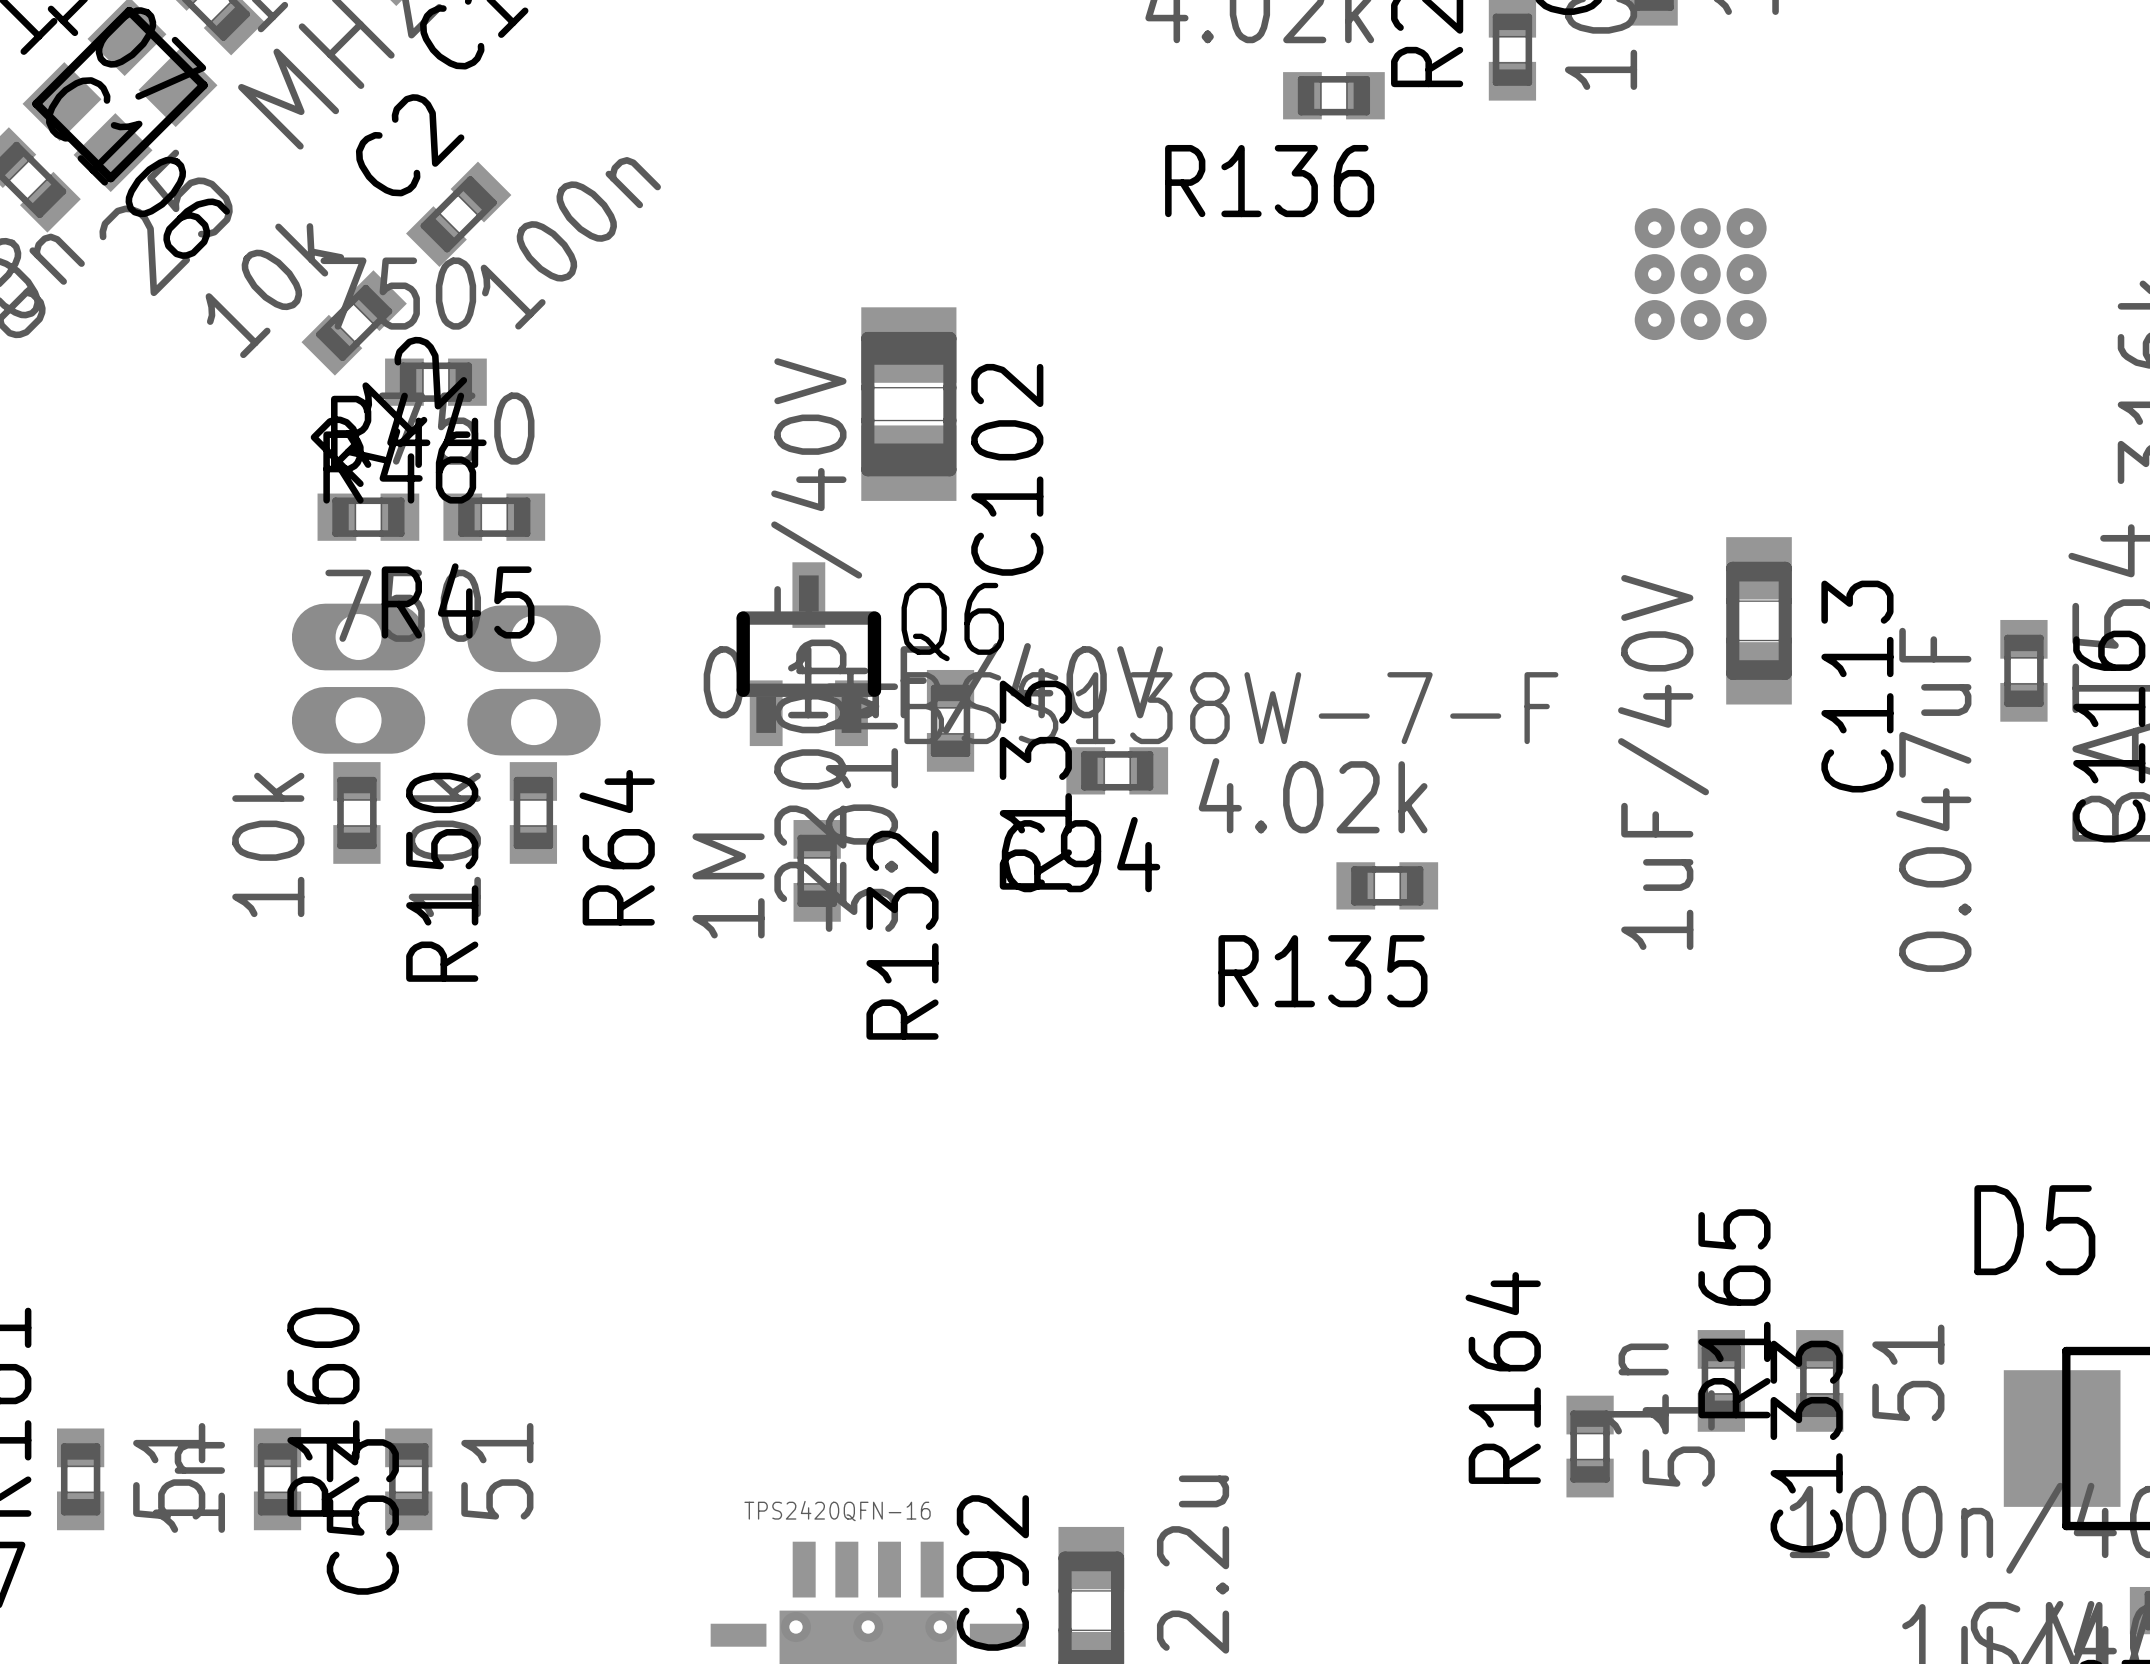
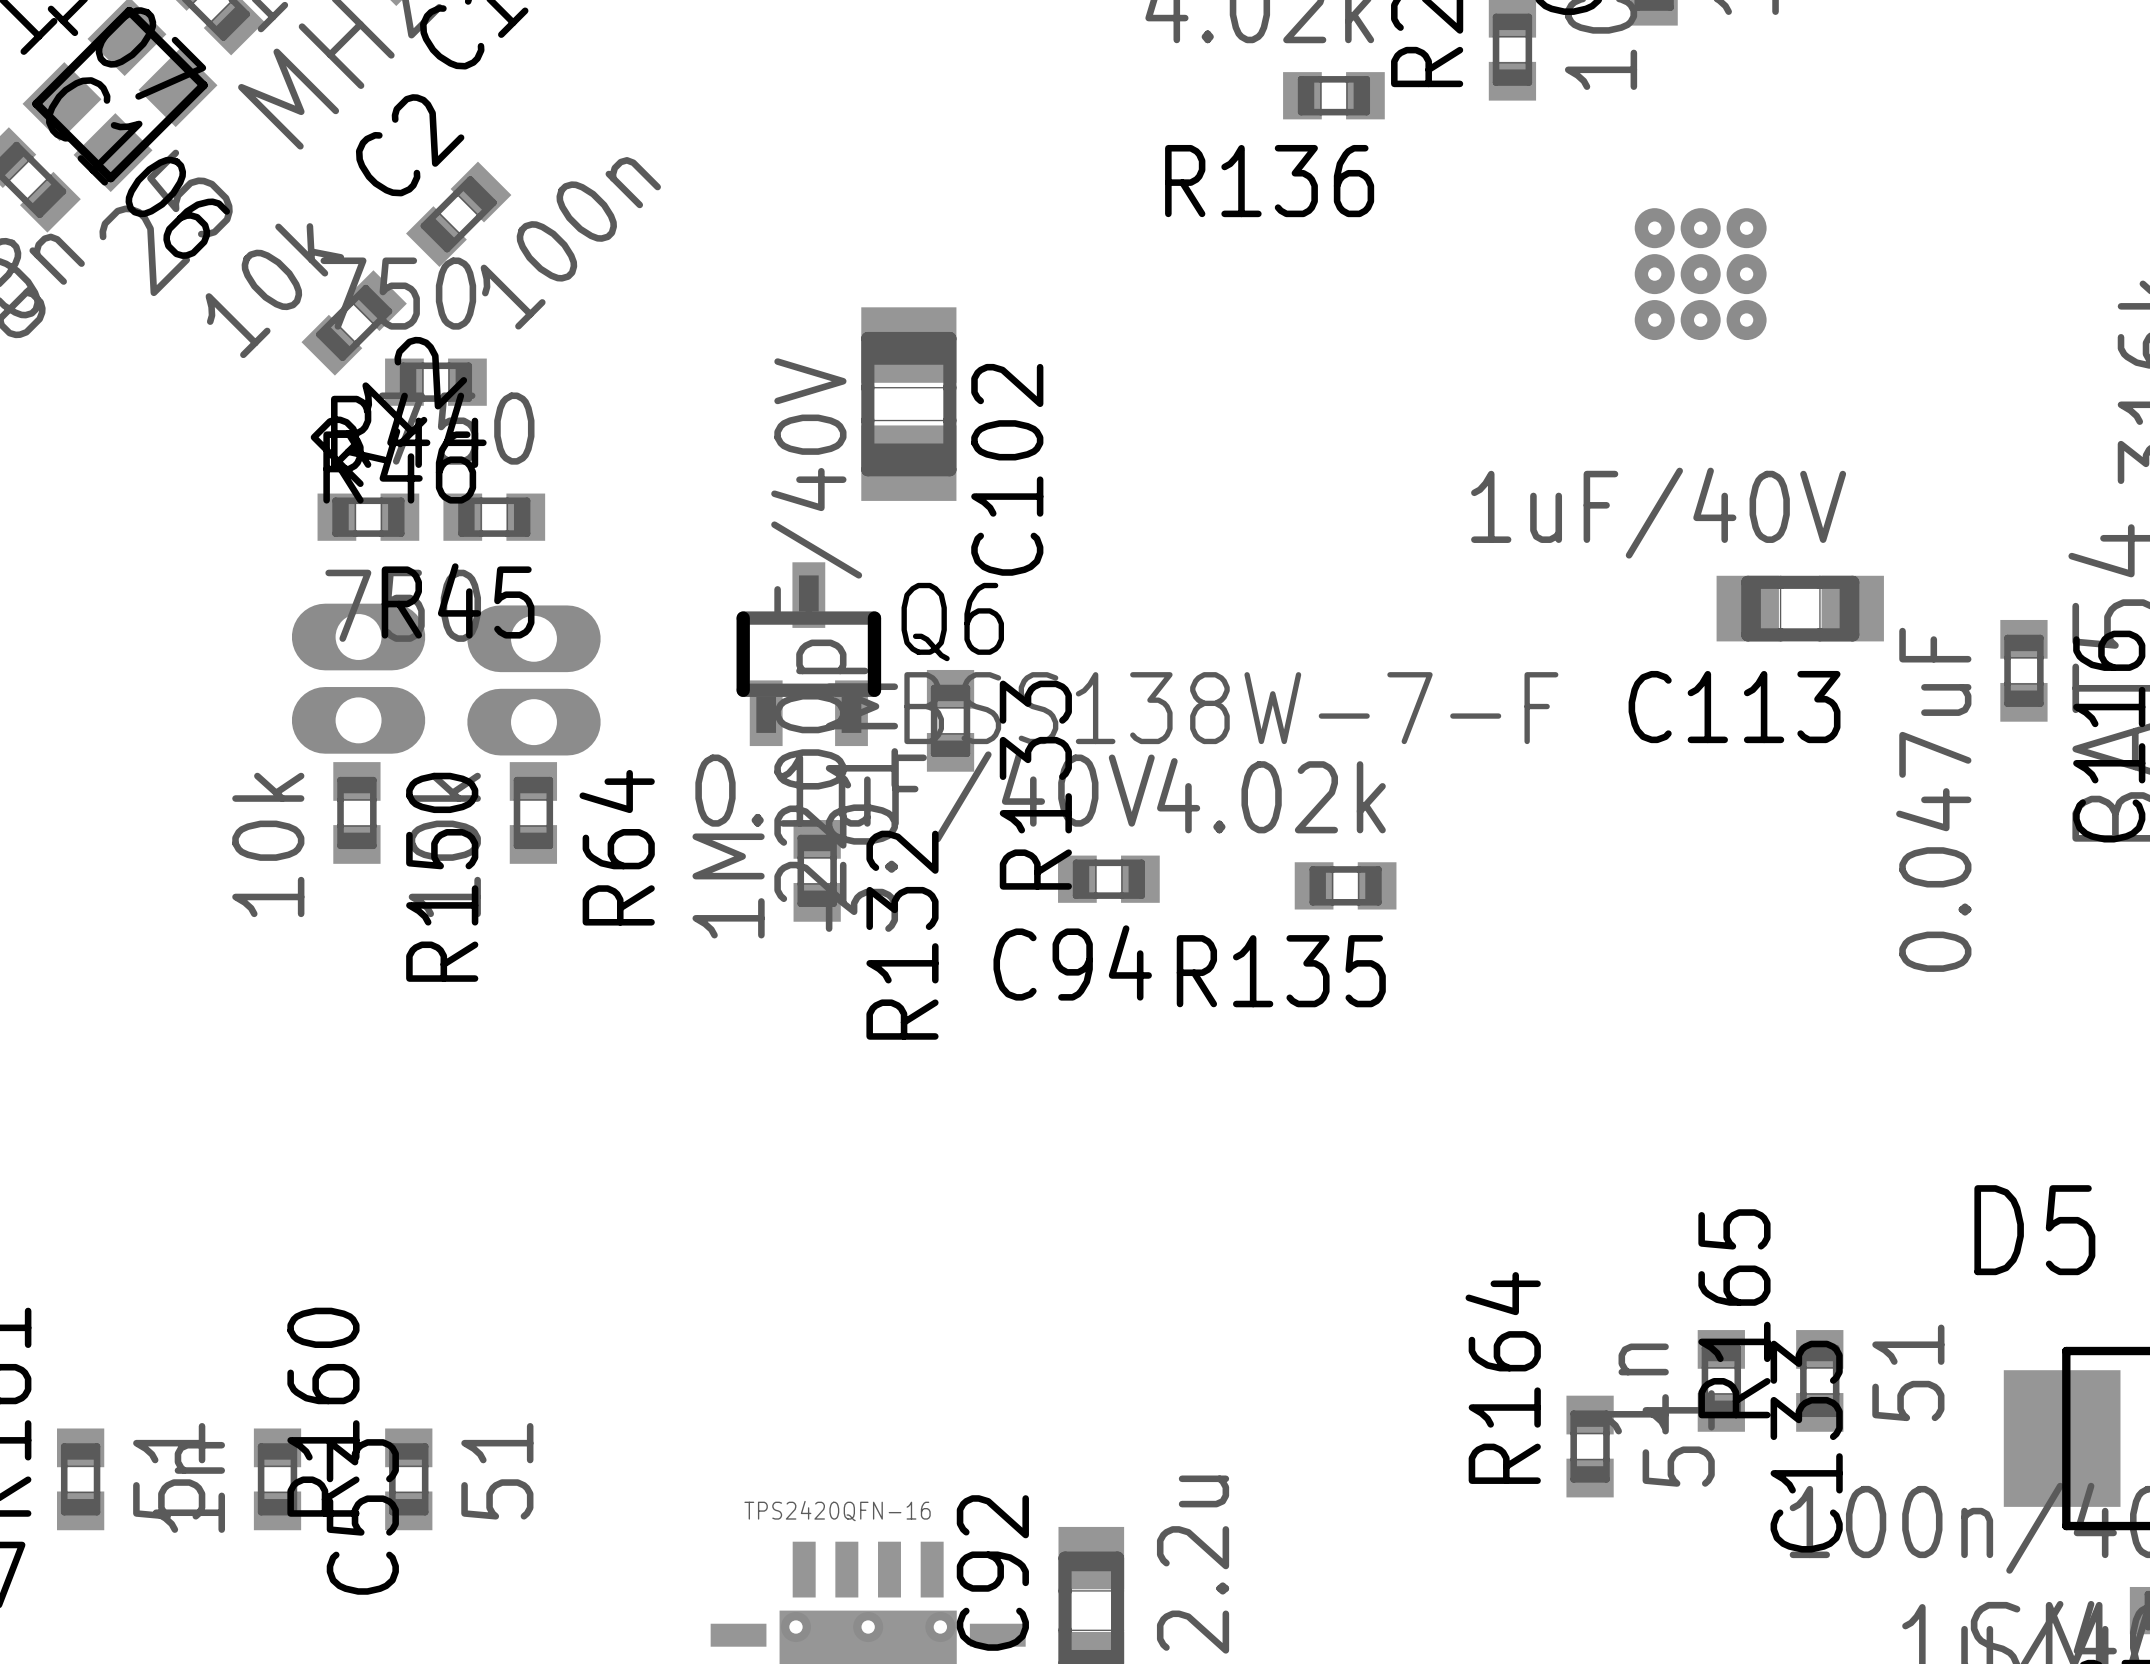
C113 rotation: 0° (1759, 620) -> 90° clockwise (1800, 608)
C94 position: (1117, 770) -> (1108, 879)
R135 position: (1387, 885) -> (1345, 885)

